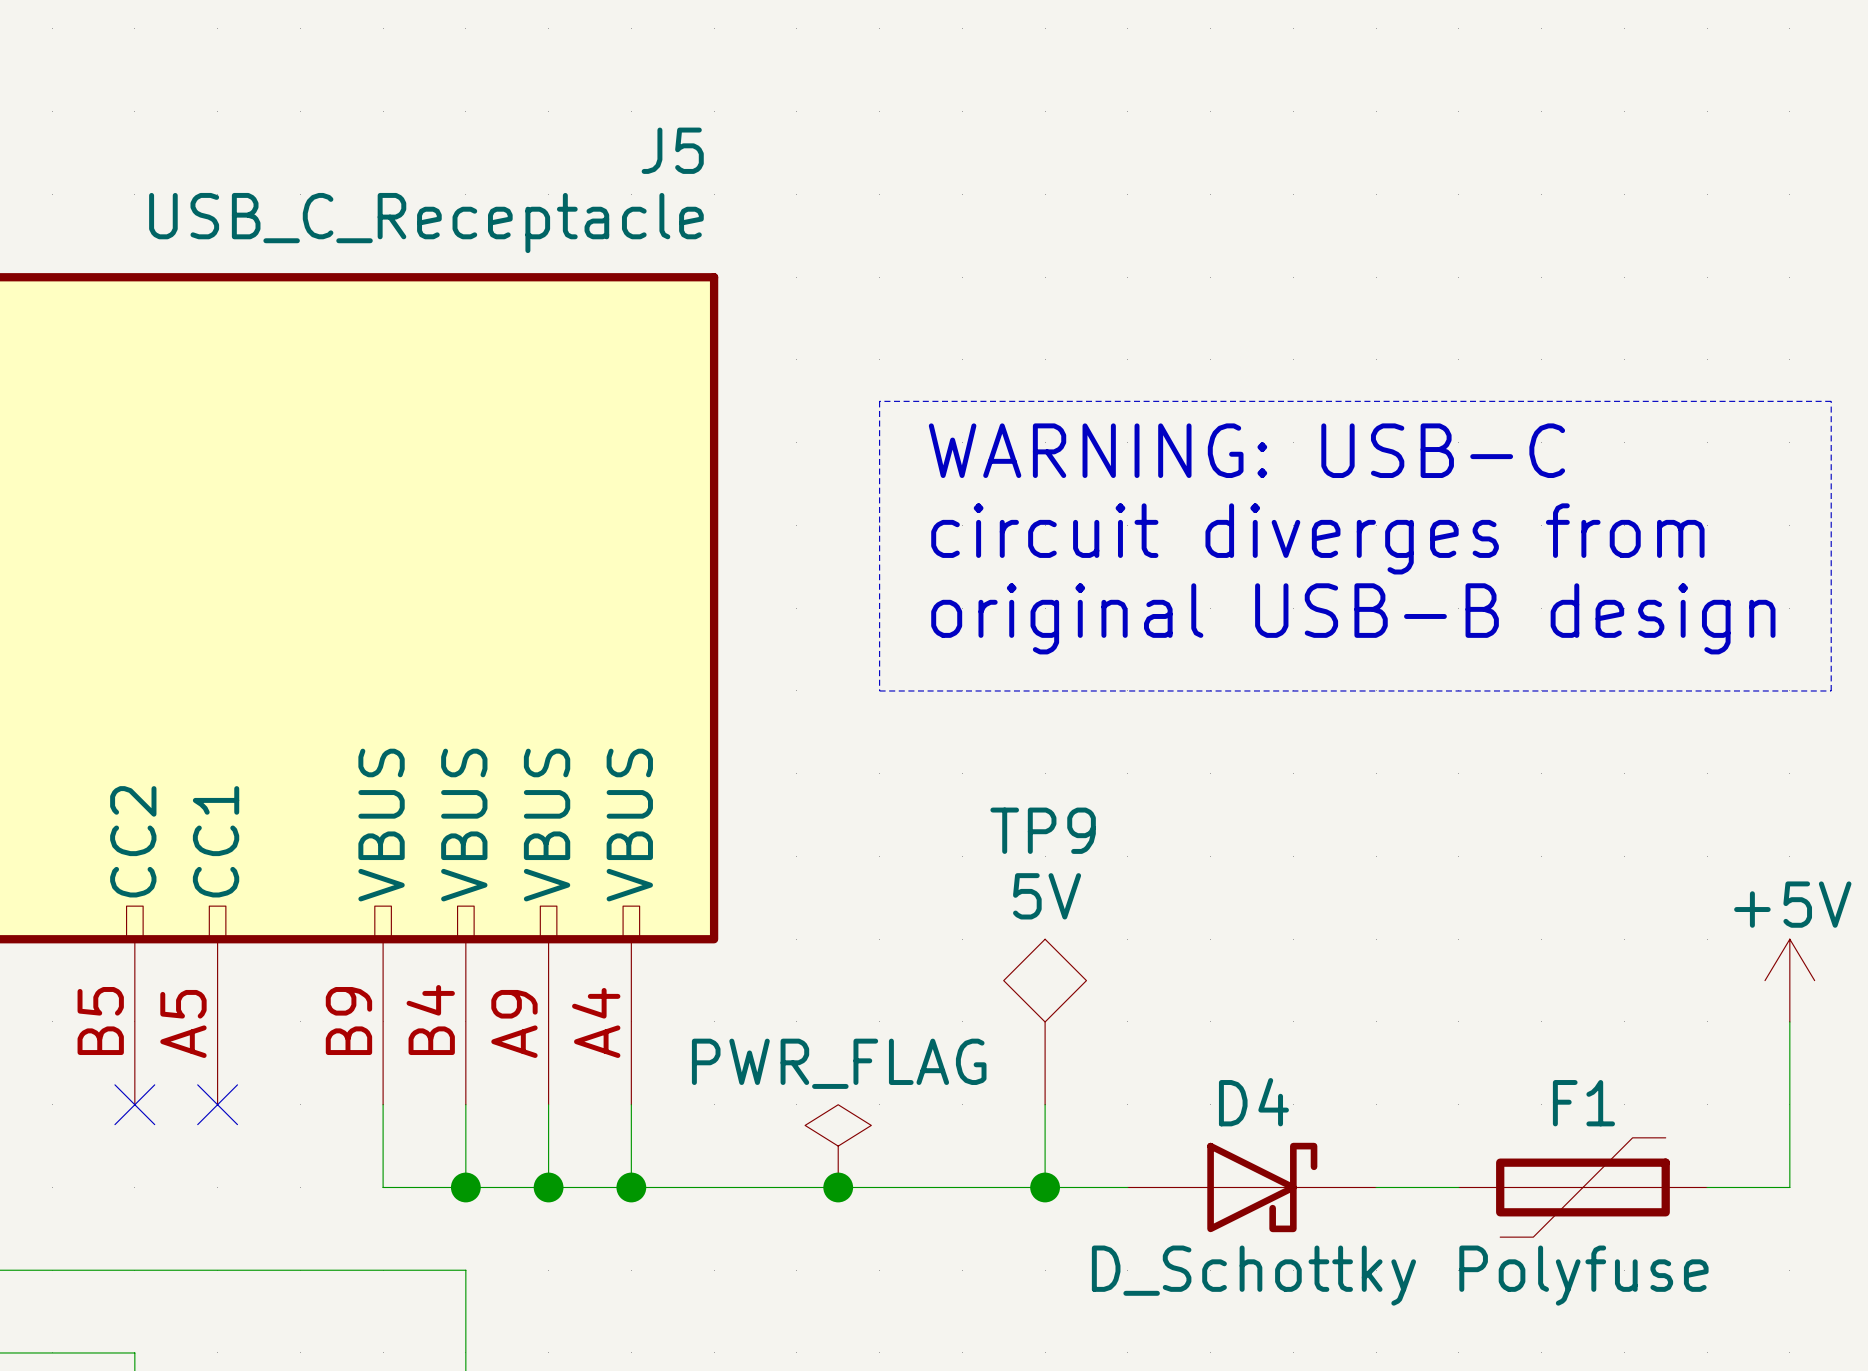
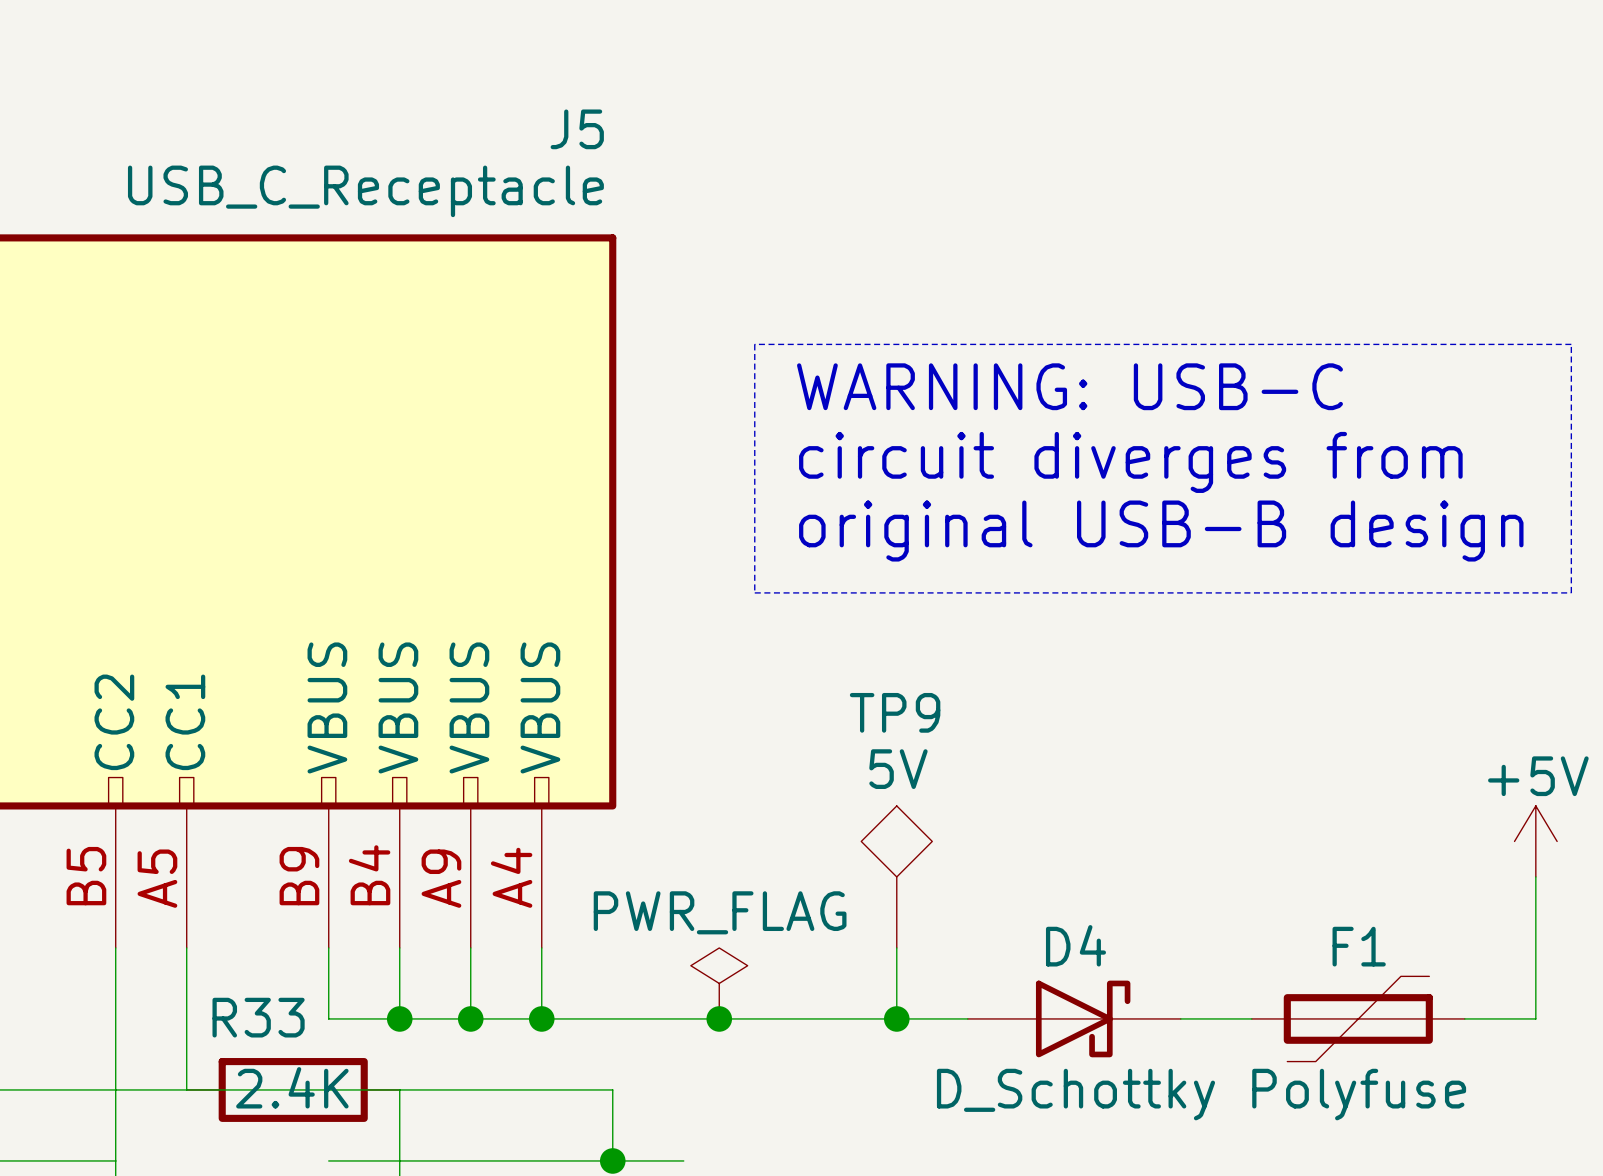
wire: none -> (115, 947) (115, 1160)
no-connect mark: (134, 1104) -> none
wire: none -> (186, 947) (186, 1089)
no-connect mark: (217, 1104) -> none
R33: none -> 2.4K (293, 1089)
wire: none -> (399, 1089) (612, 1089) (612, 1160)
wire: none -> (328, 1160) (683, 1160)
junction: none -> (612, 1160)

